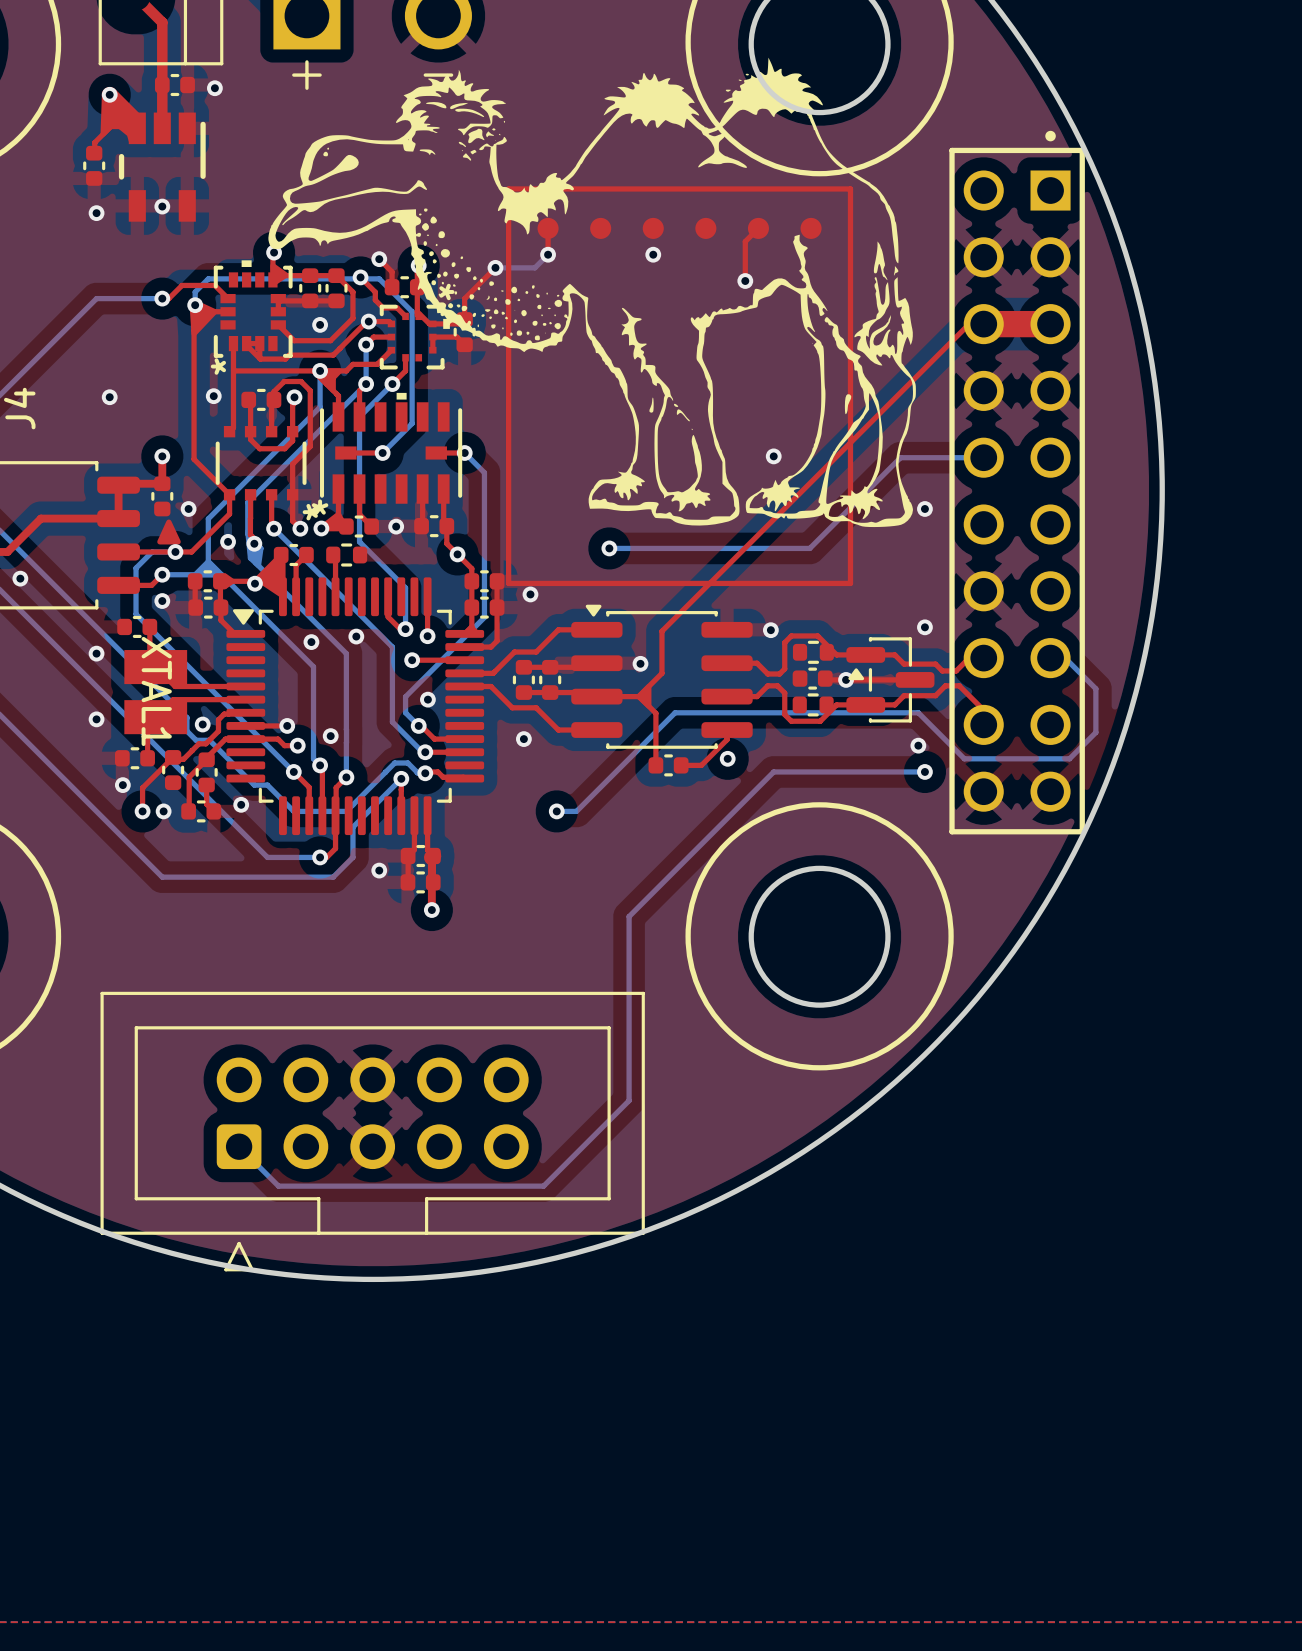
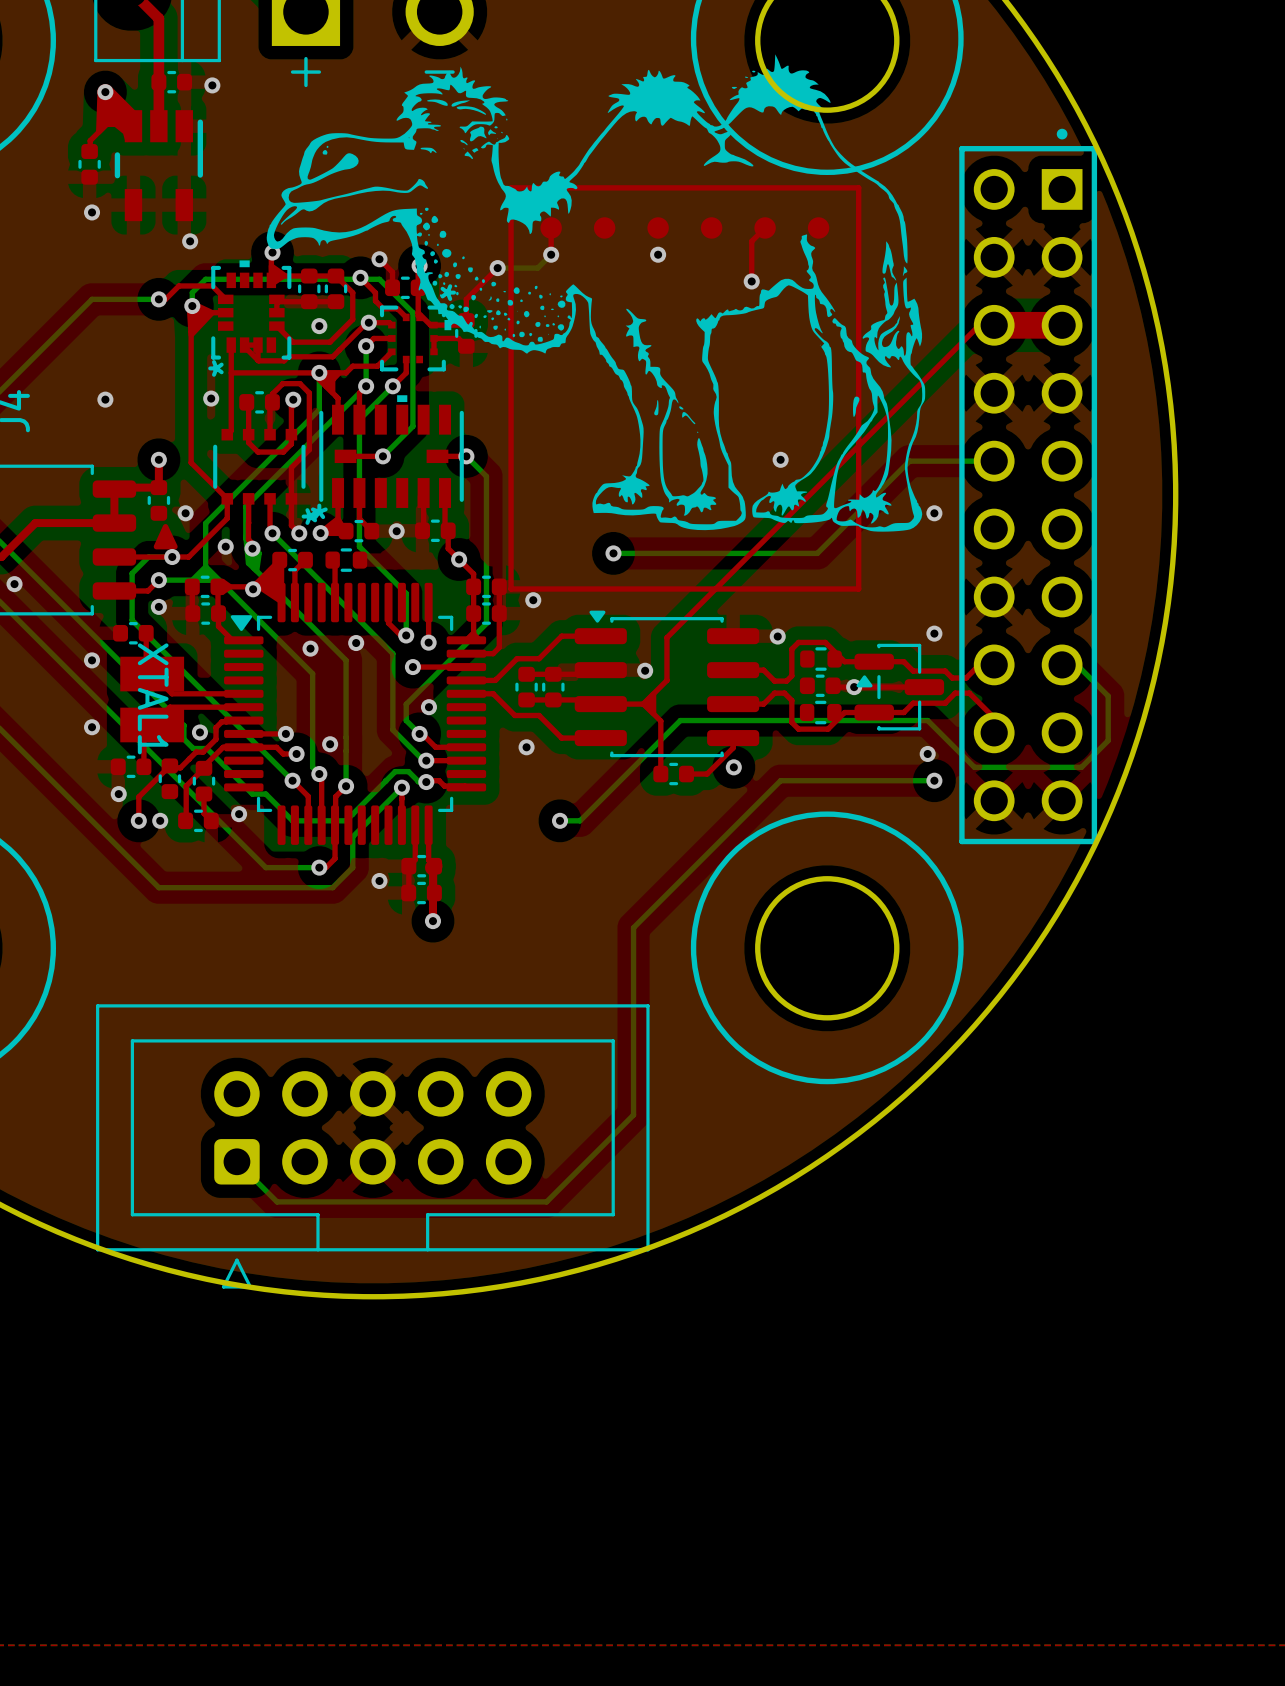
via position: (162, 206) -> (190, 241)

